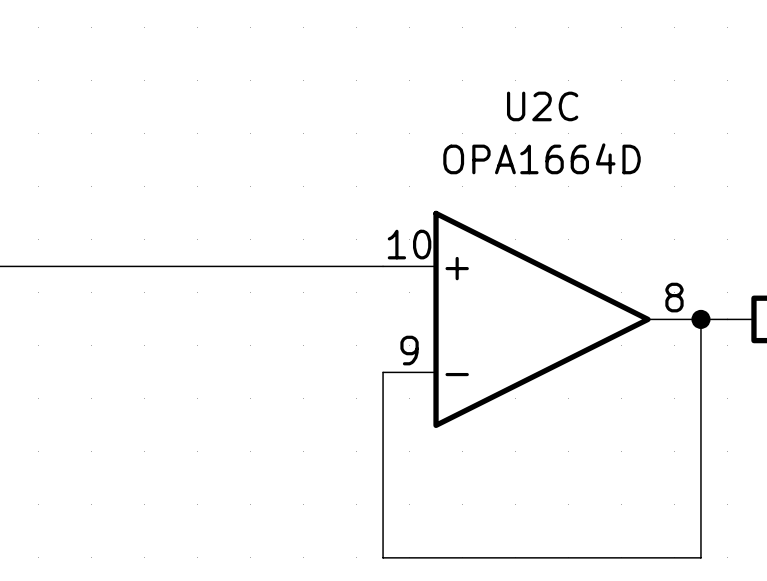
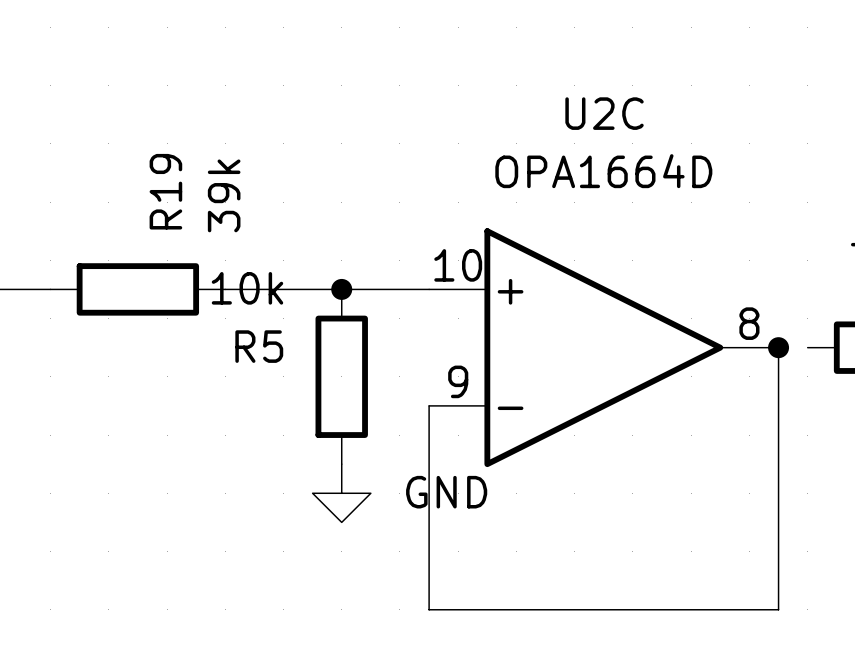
wire: (38, 266) (197, 266) -> none
R19: none -> 39k (137, 289)
junction: none -> (341, 289)
wire: (700, 319) (727, 319) -> none
R5: none -> 10k (341, 376)
power symbol: none -> GND (341, 493)

